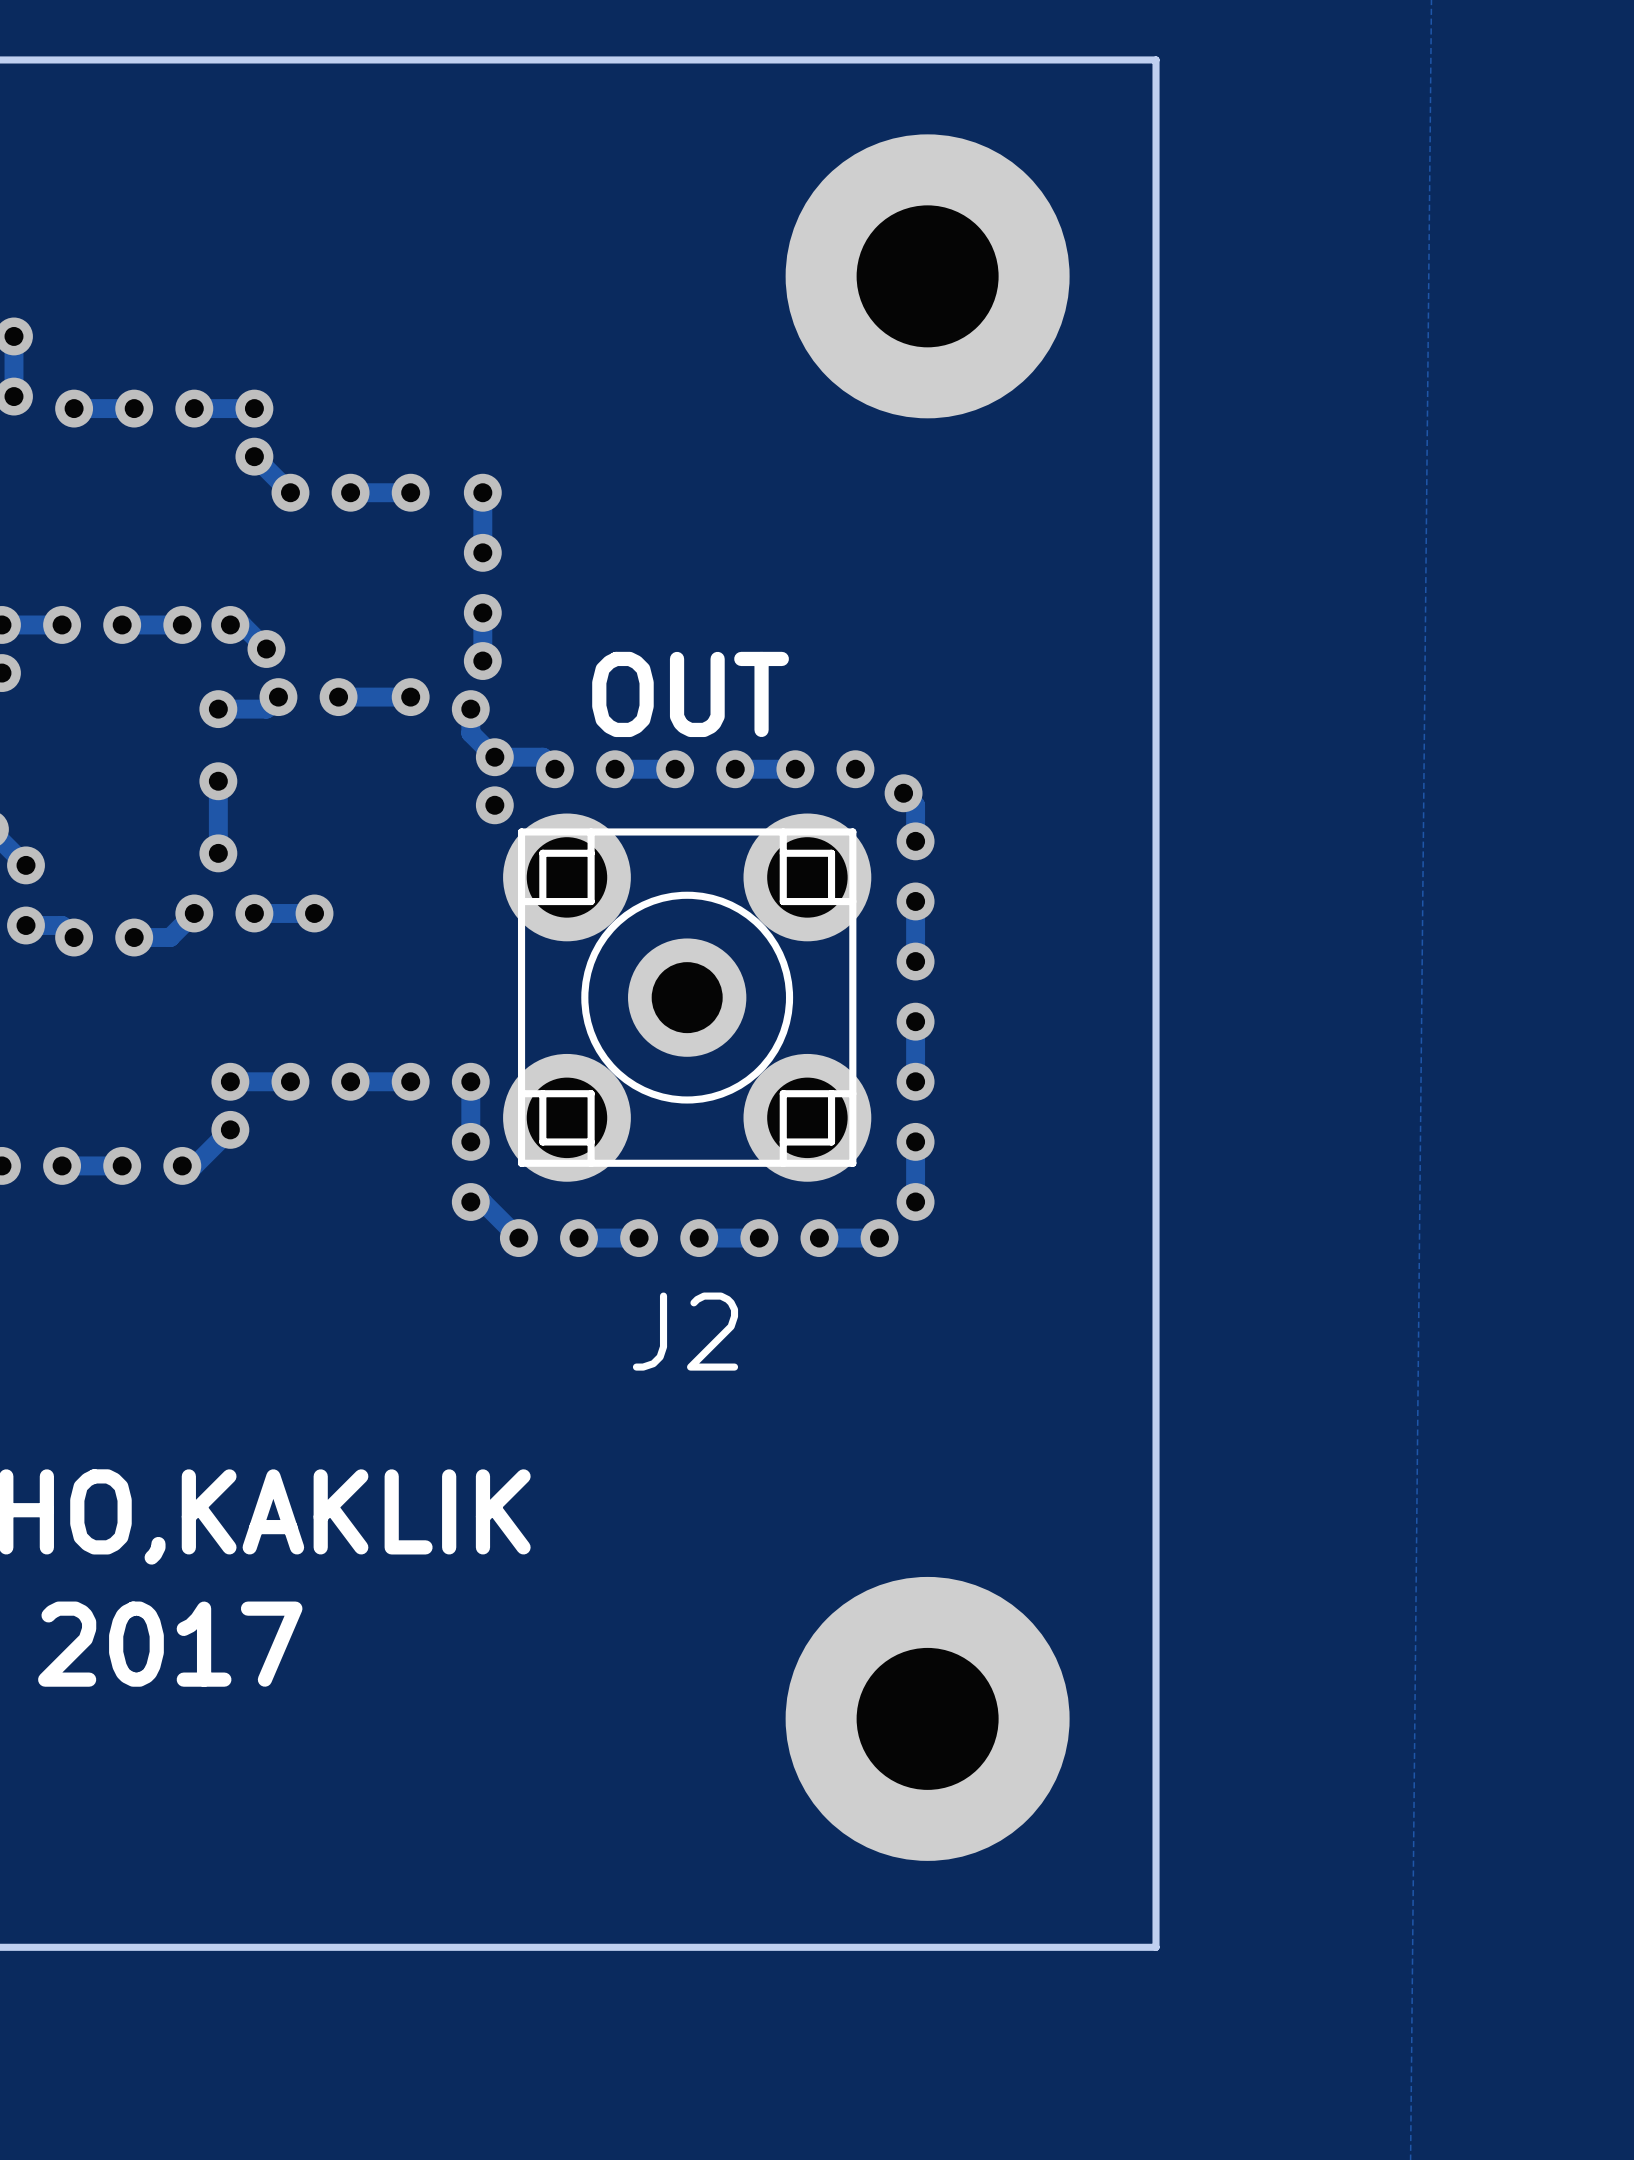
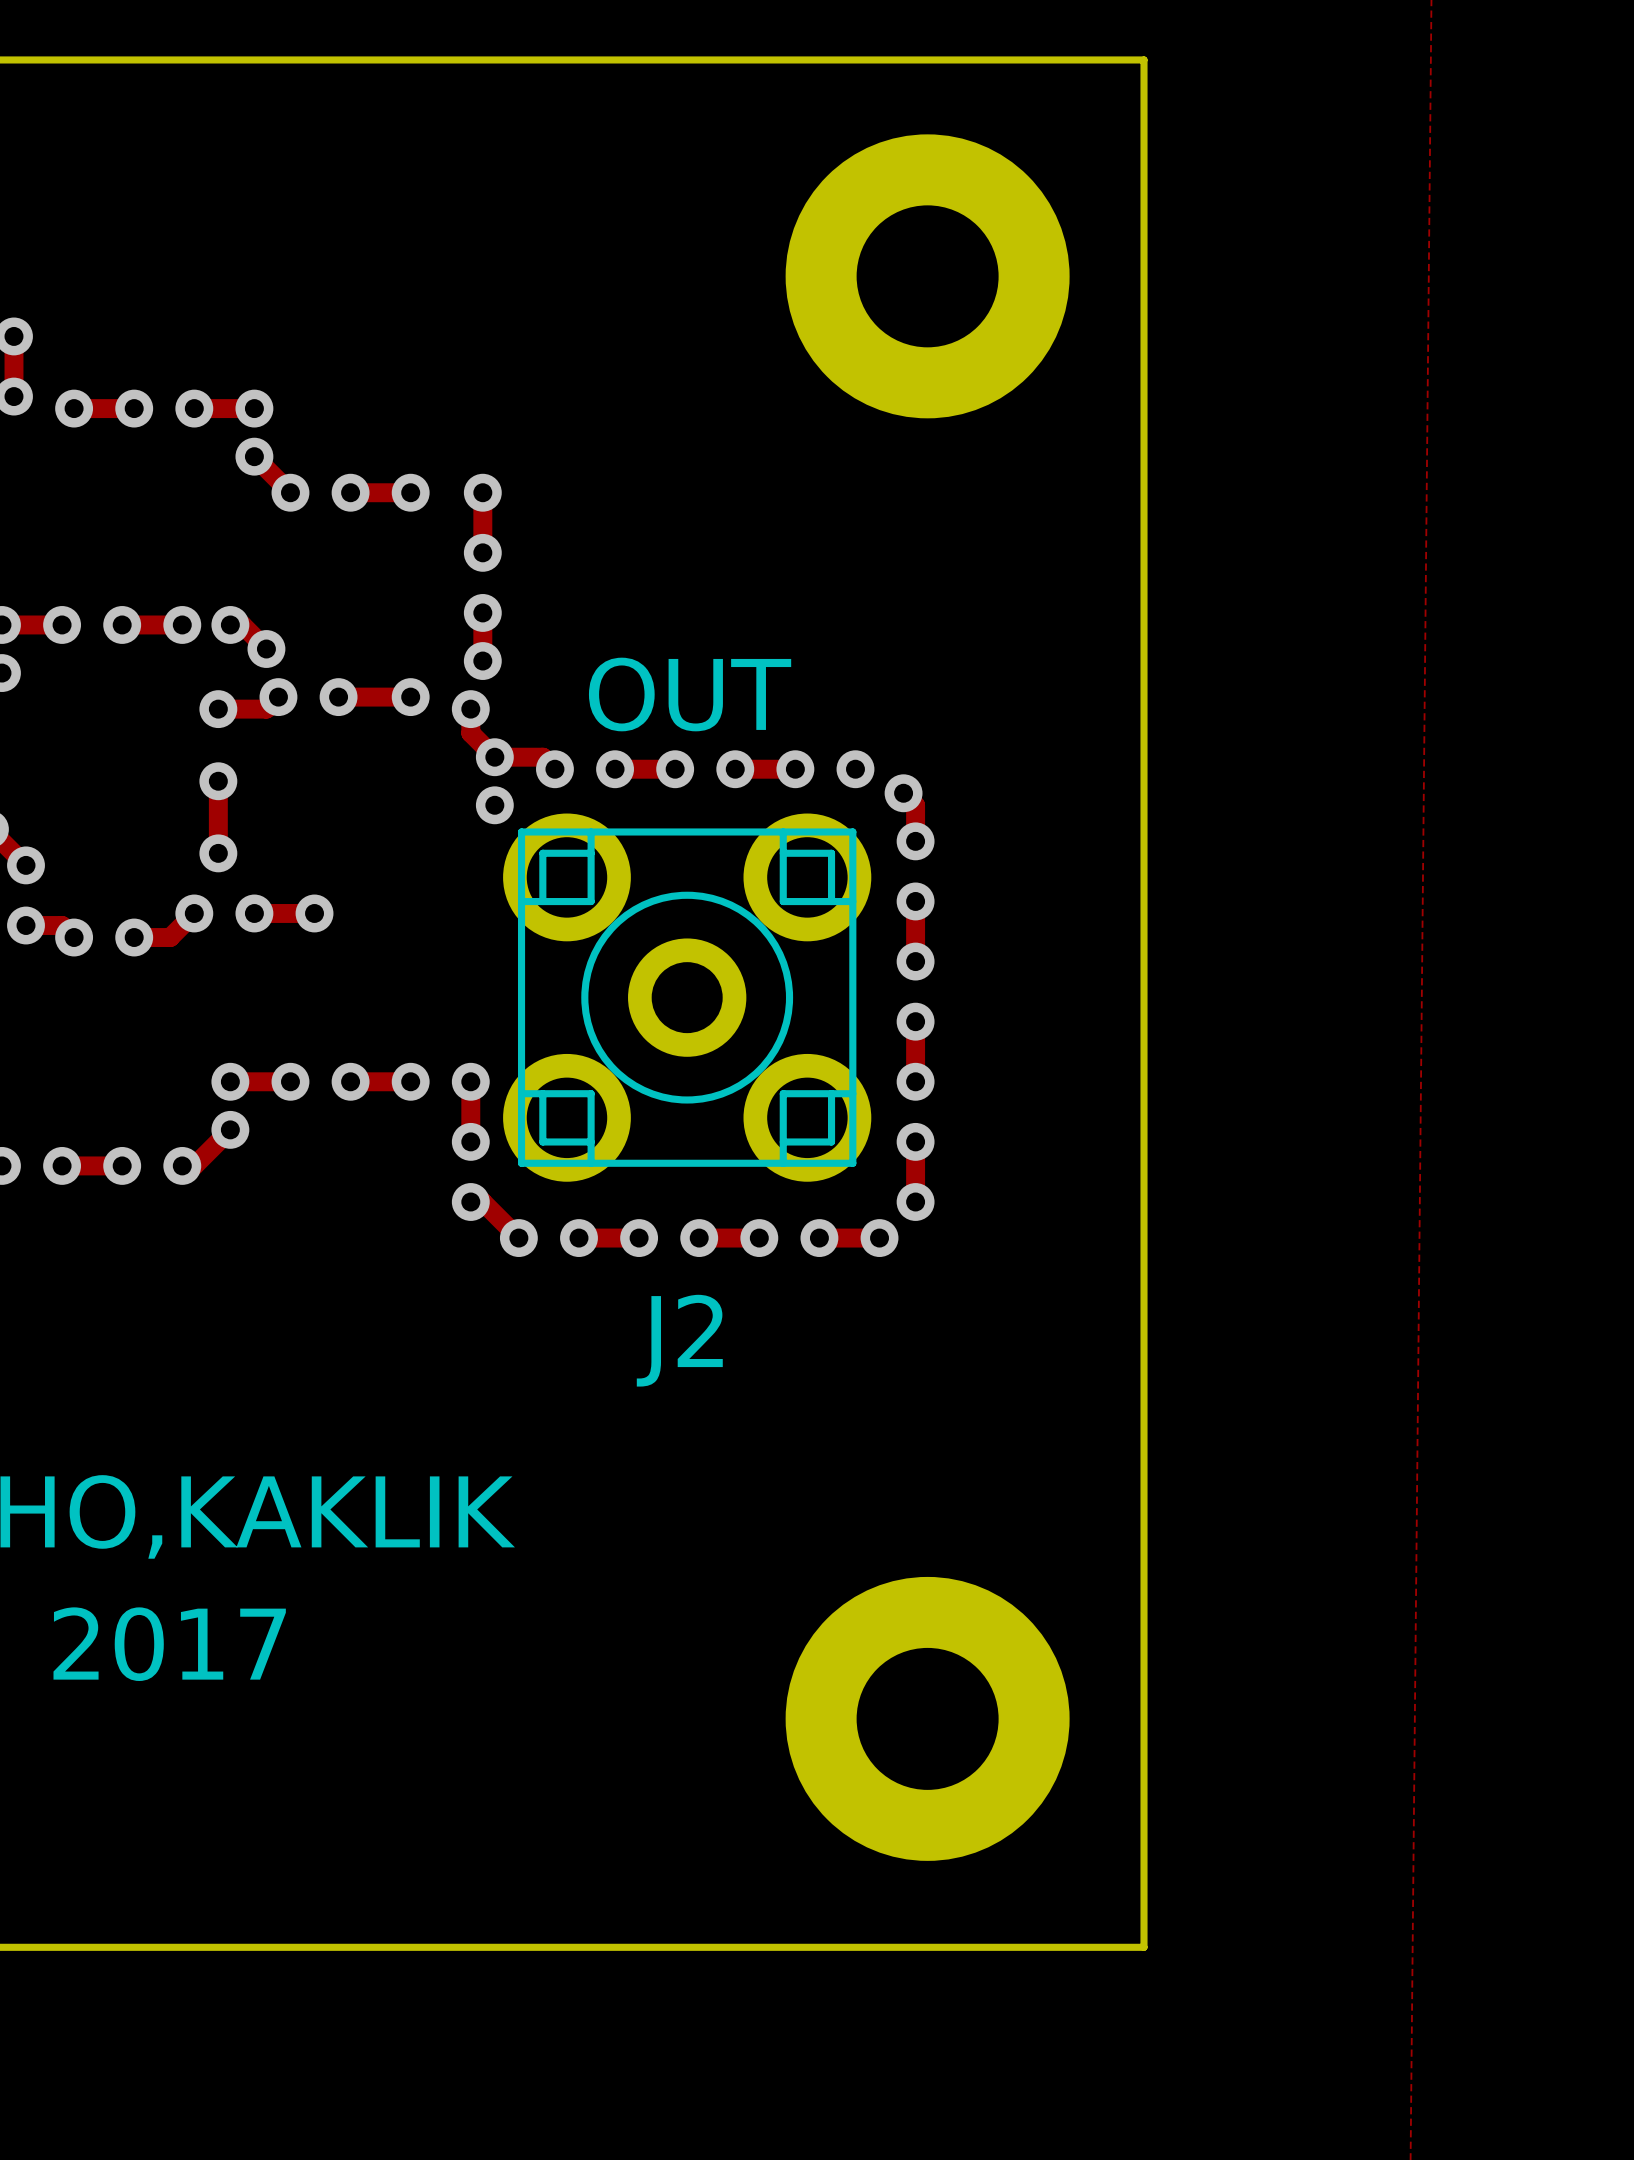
board edge: (1144, 59) (1156, 59) (1156, 1947) (1144, 1947) -> (1144, 59) (1144, 1947)

